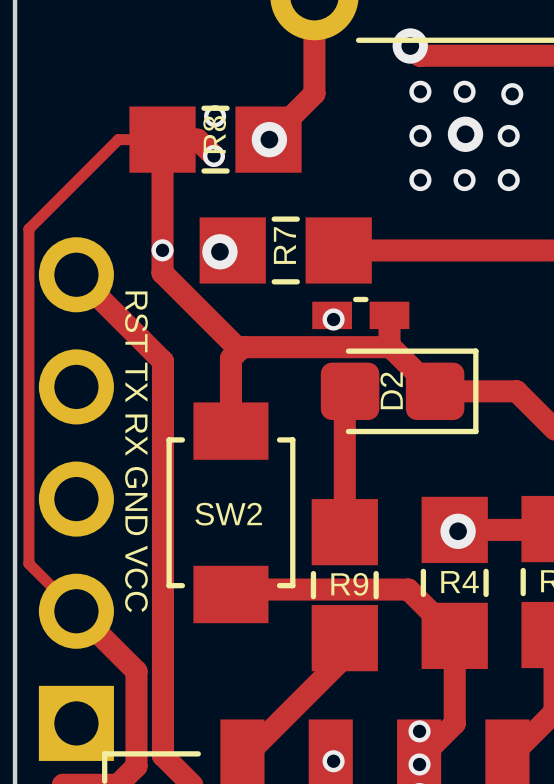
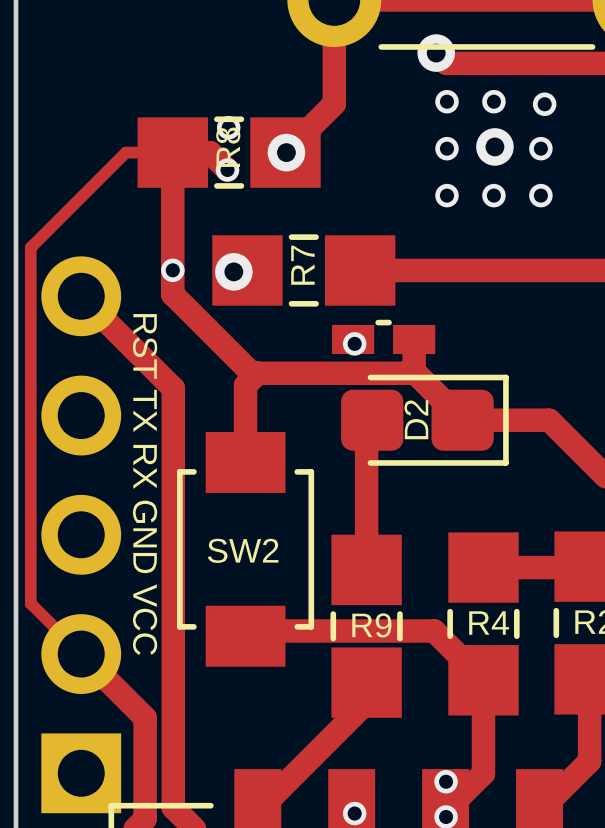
via: (458, 531) -> none

